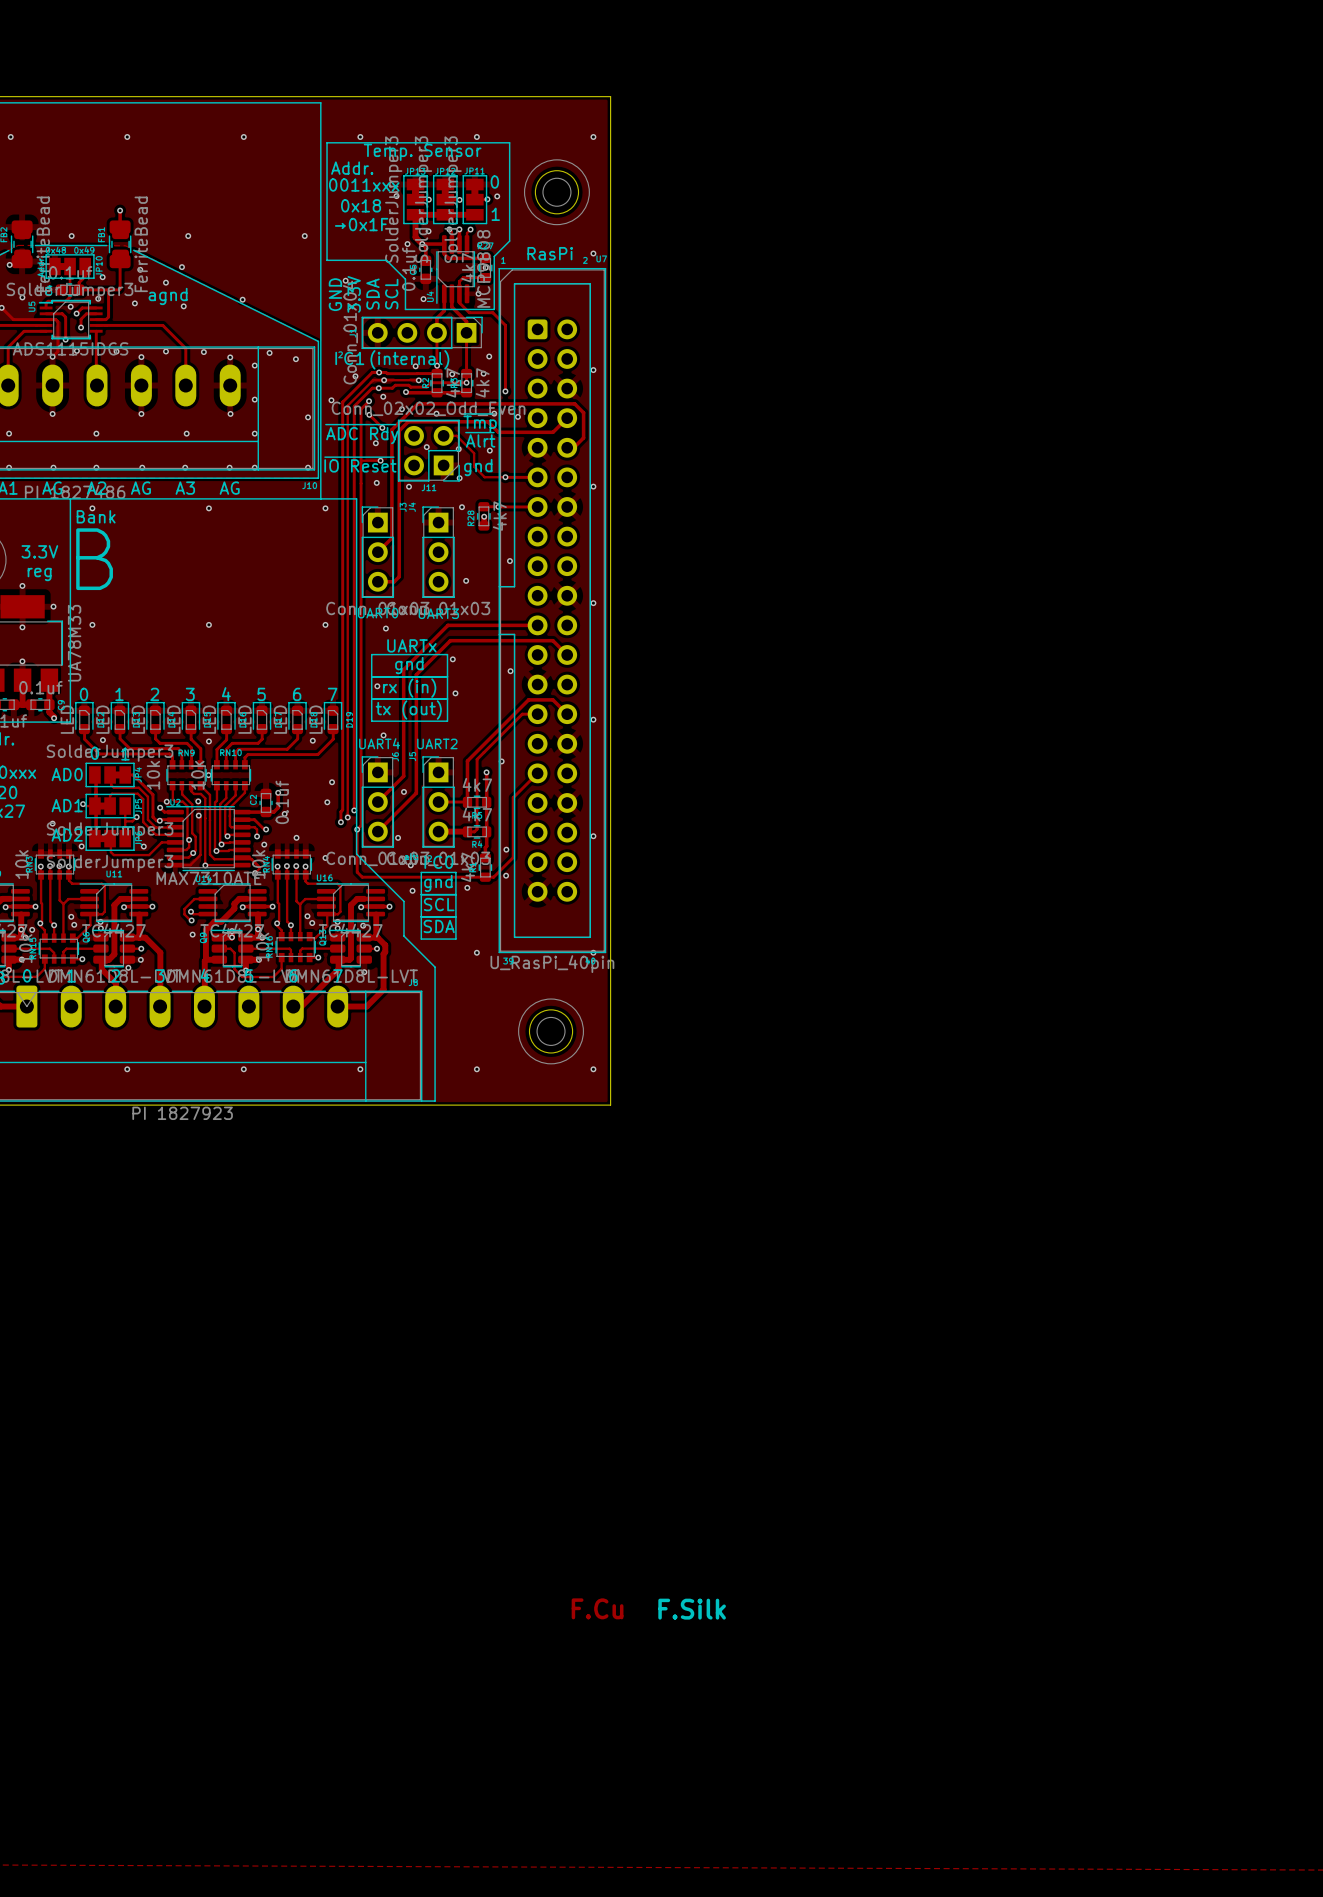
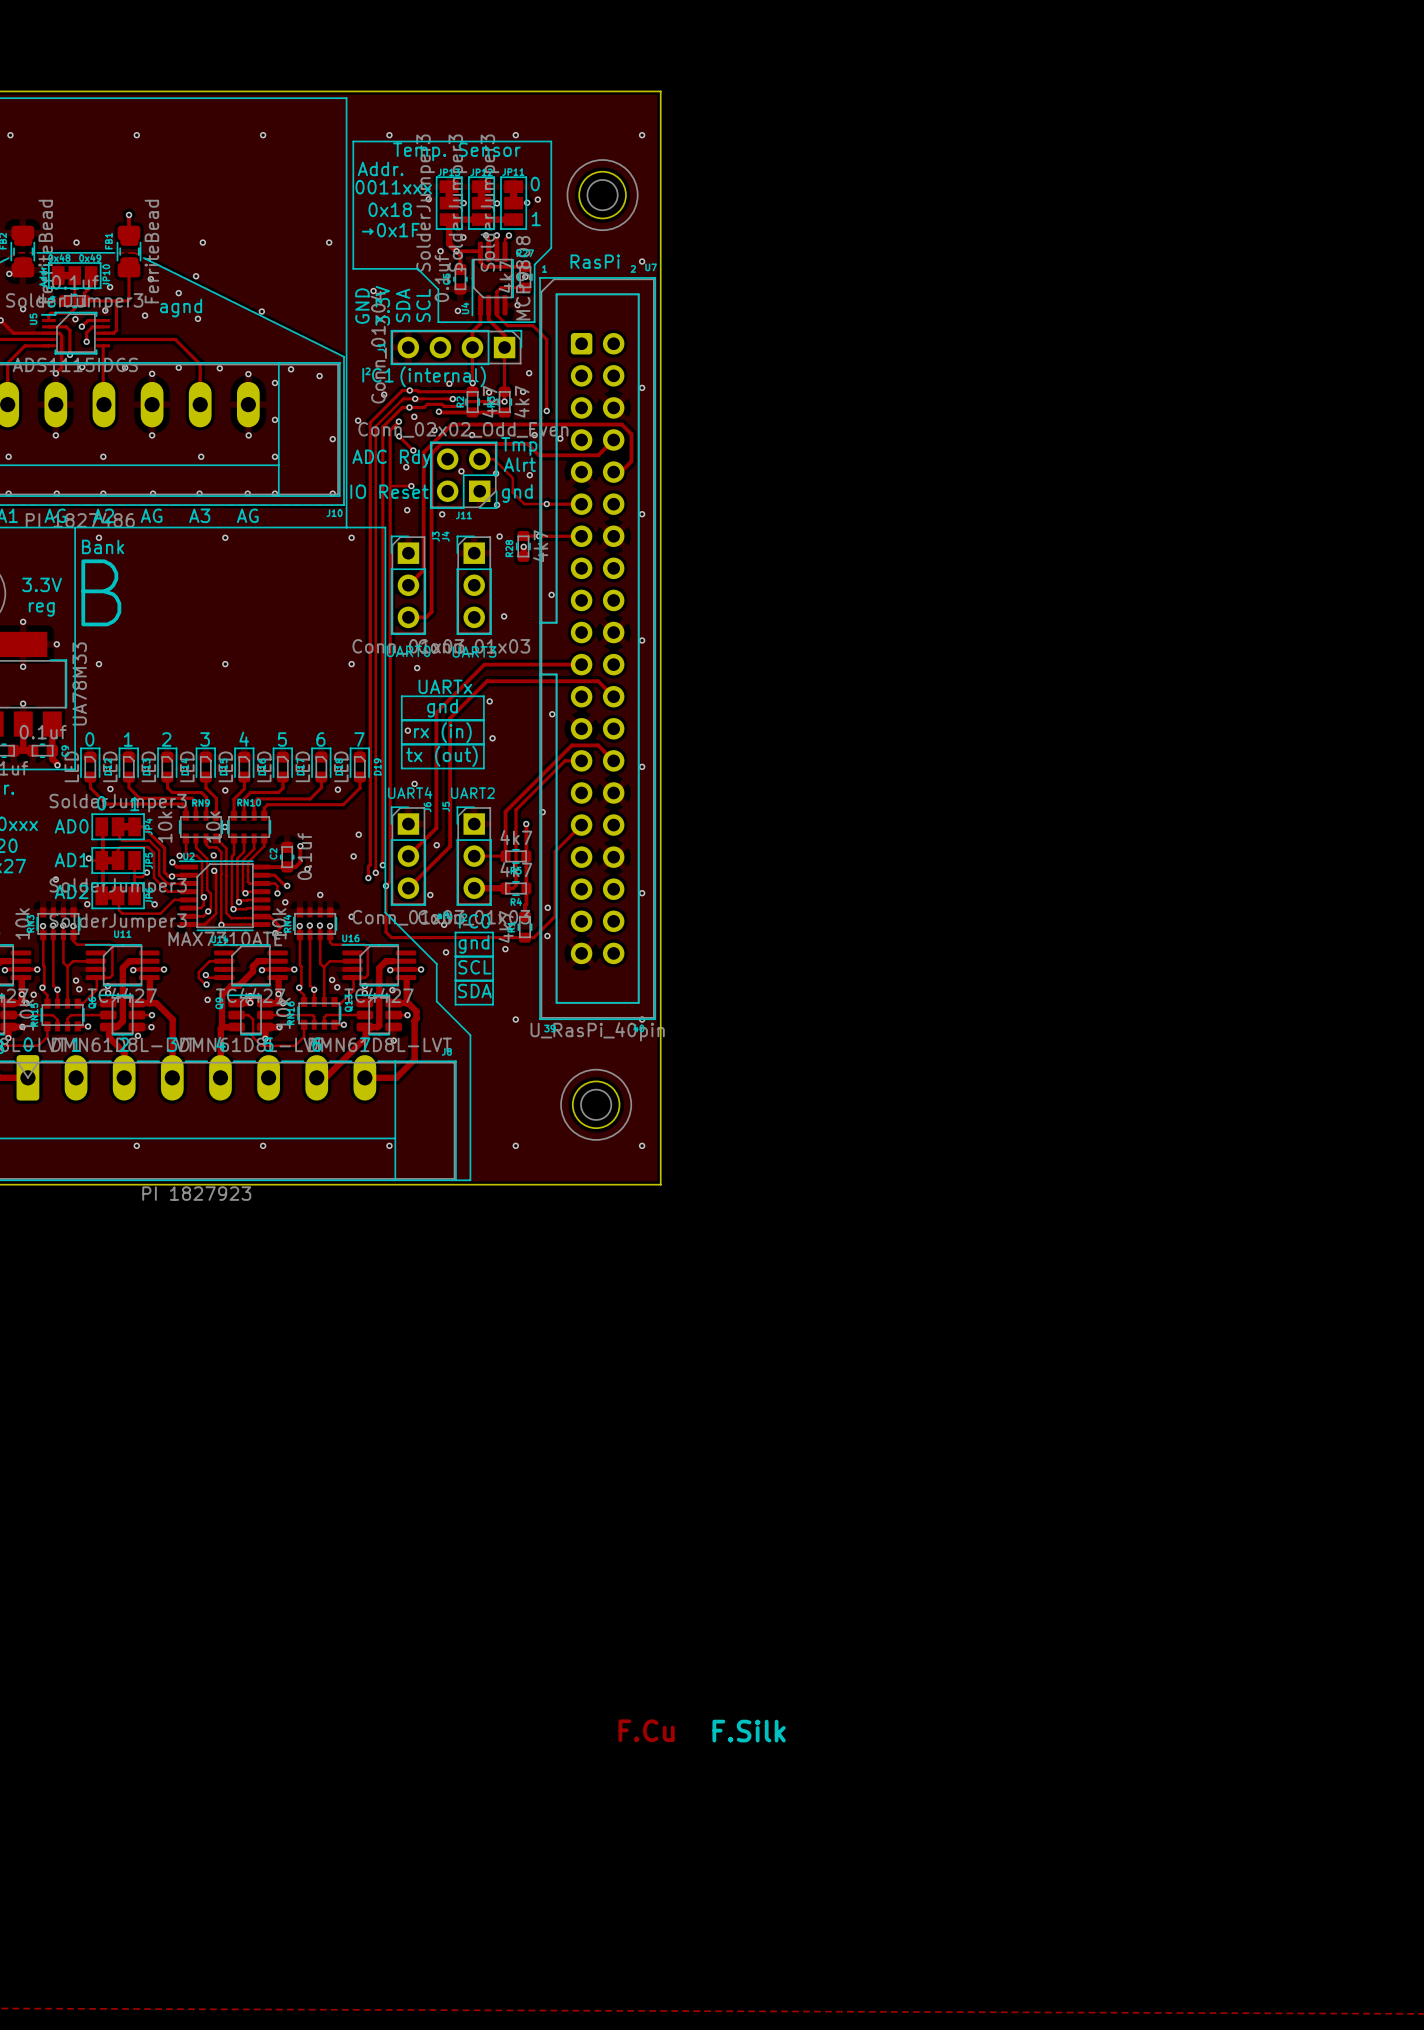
line: (464, 413) (492, 413) -> none
line: (325, 424) (395, 424) -> none
line: (465, 432) (493, 432) -> none
line: (324, 457) (393, 457) -> none

